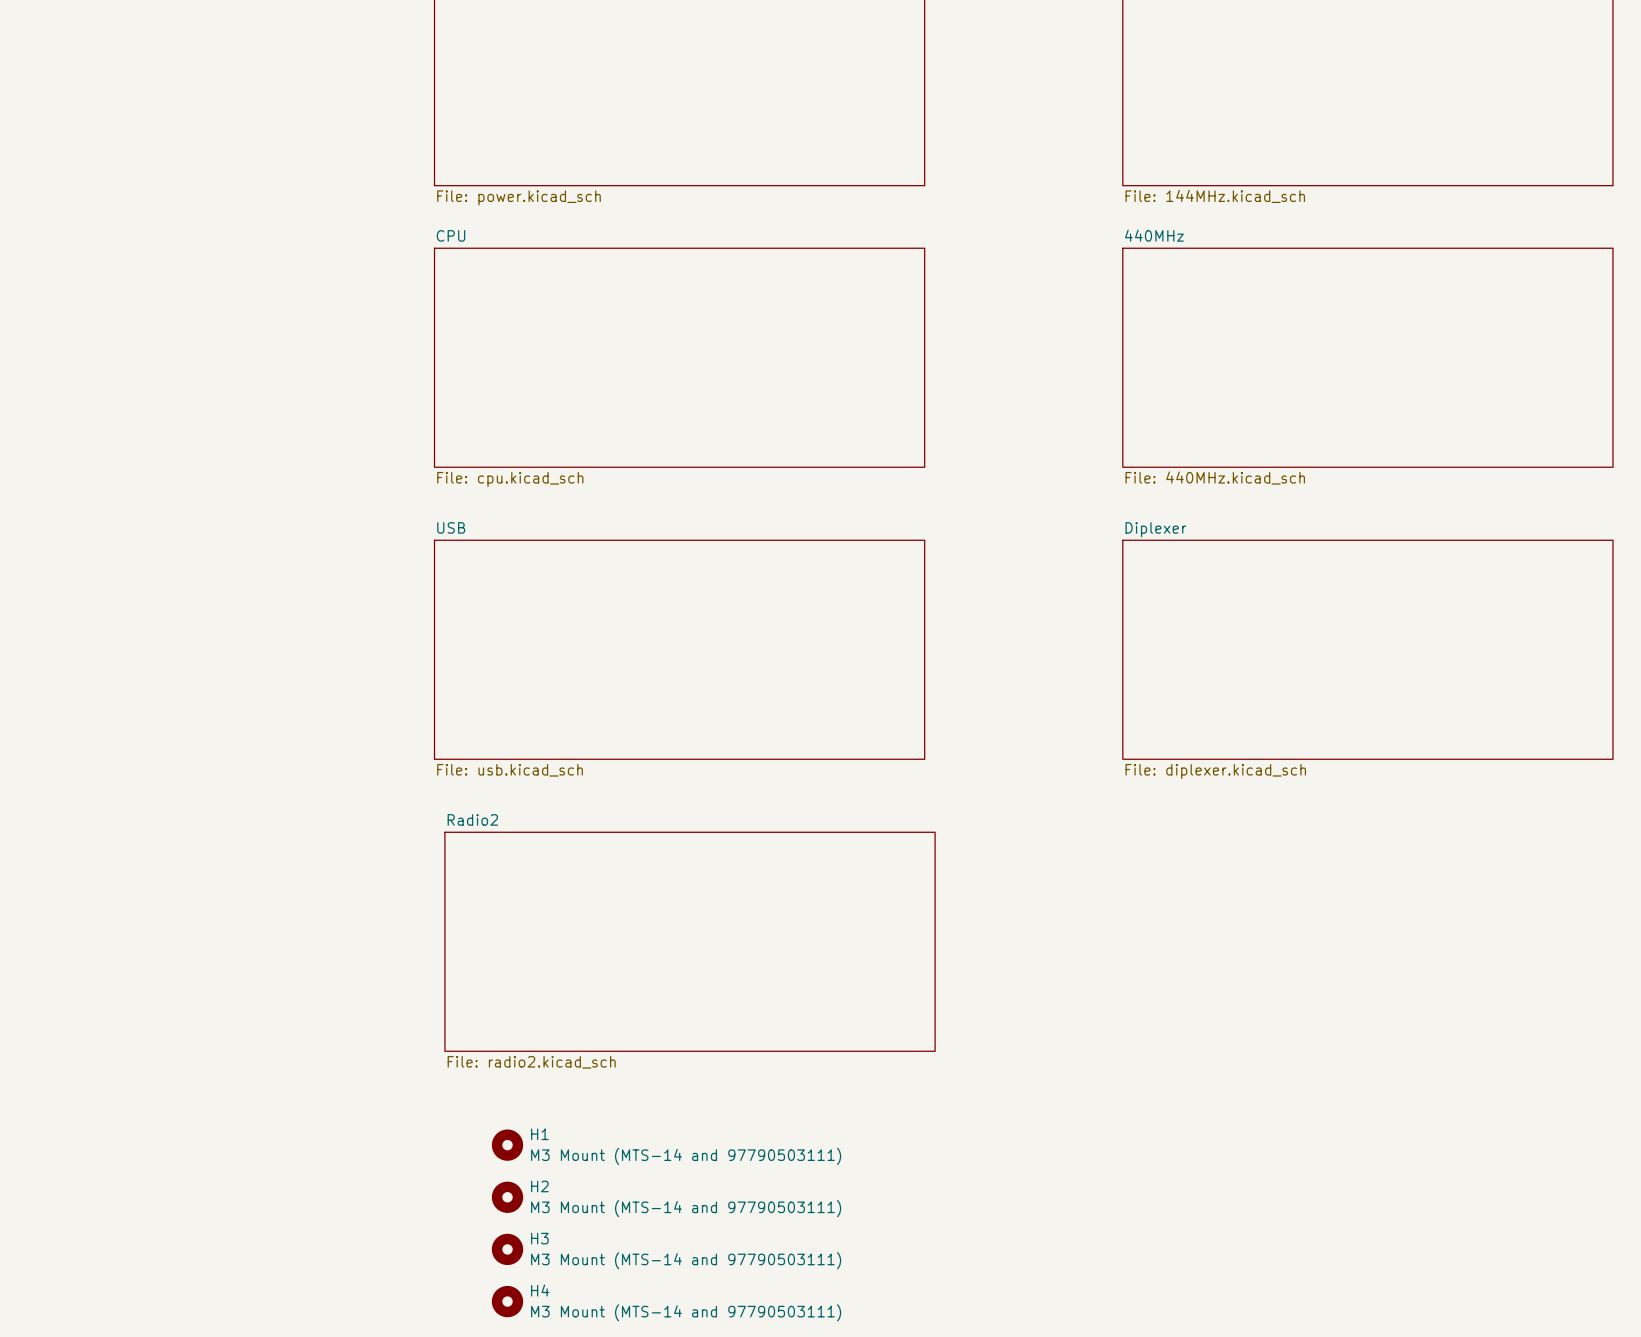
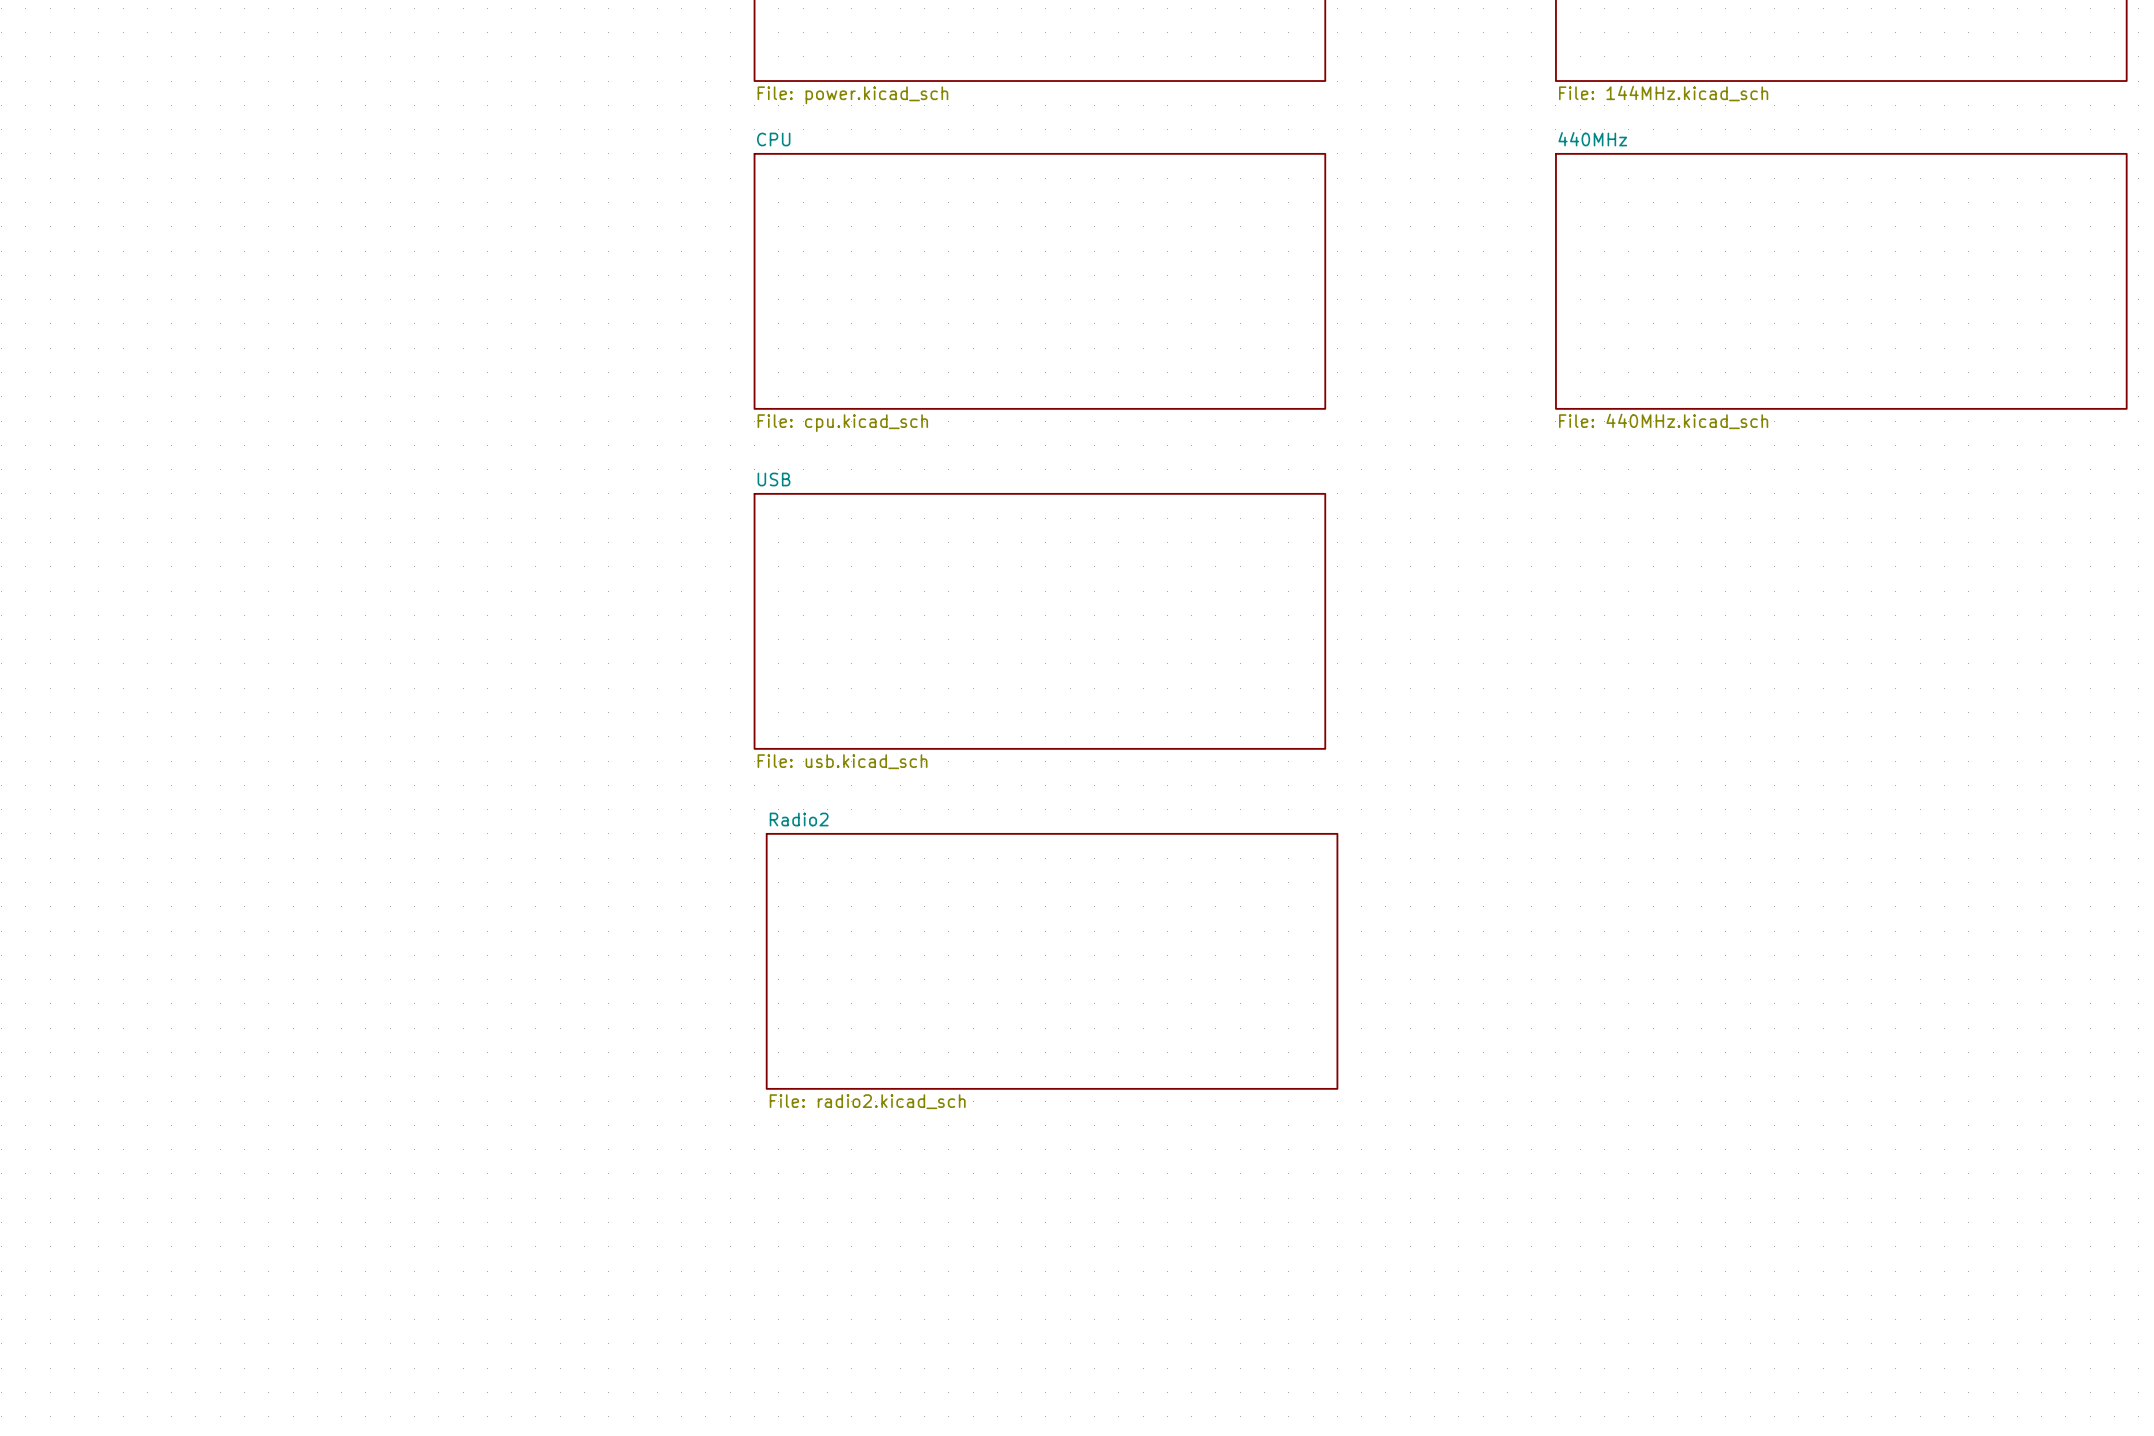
sheet Diplexer: File: diplexer.kicad_sch (1367, 649) -> none
H1: M3 Mount (MTS-14 and 97790503111) (507, 1145) -> none
H2: M3 Mount (MTS-14 and 97790503111) (507, 1197) -> none
H3: M3 Mount (MTS-14 and 97790503111) (507, 1249) -> none
H4: M3 Mount (MTS-14 and 97790503111) (507, 1301) -> none

